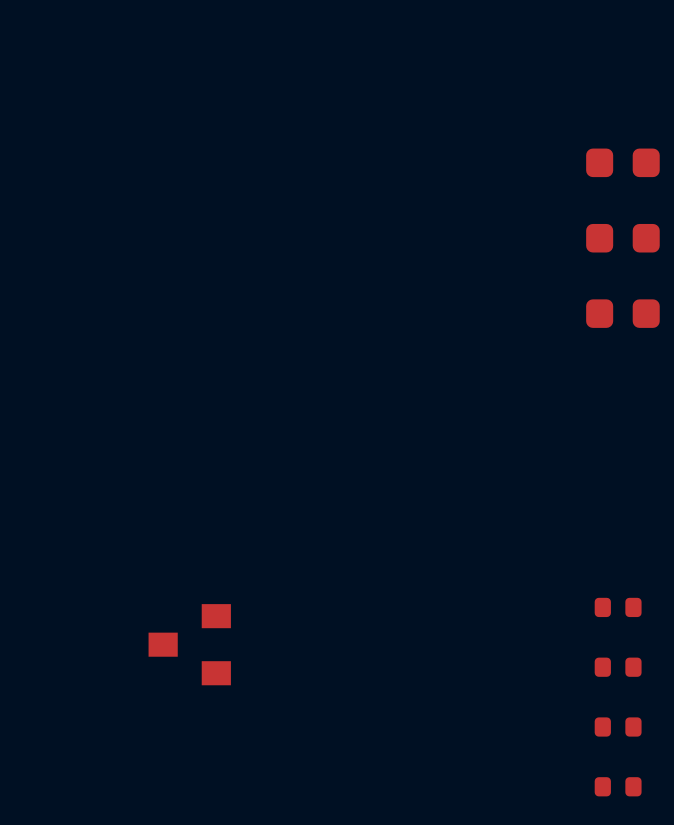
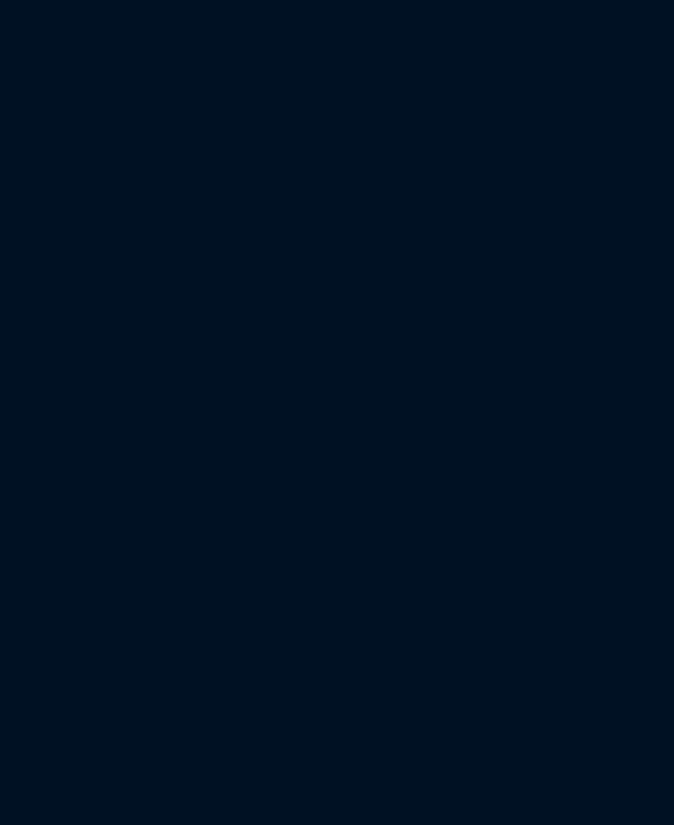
part: (622, 162) -> none
part: (622, 238) -> none
part: (622, 313) -> none
part: (618, 607) -> none
part: (189, 644) -> none
part: (618, 667) -> none
part: (618, 727) -> none
part: (618, 786) -> none

